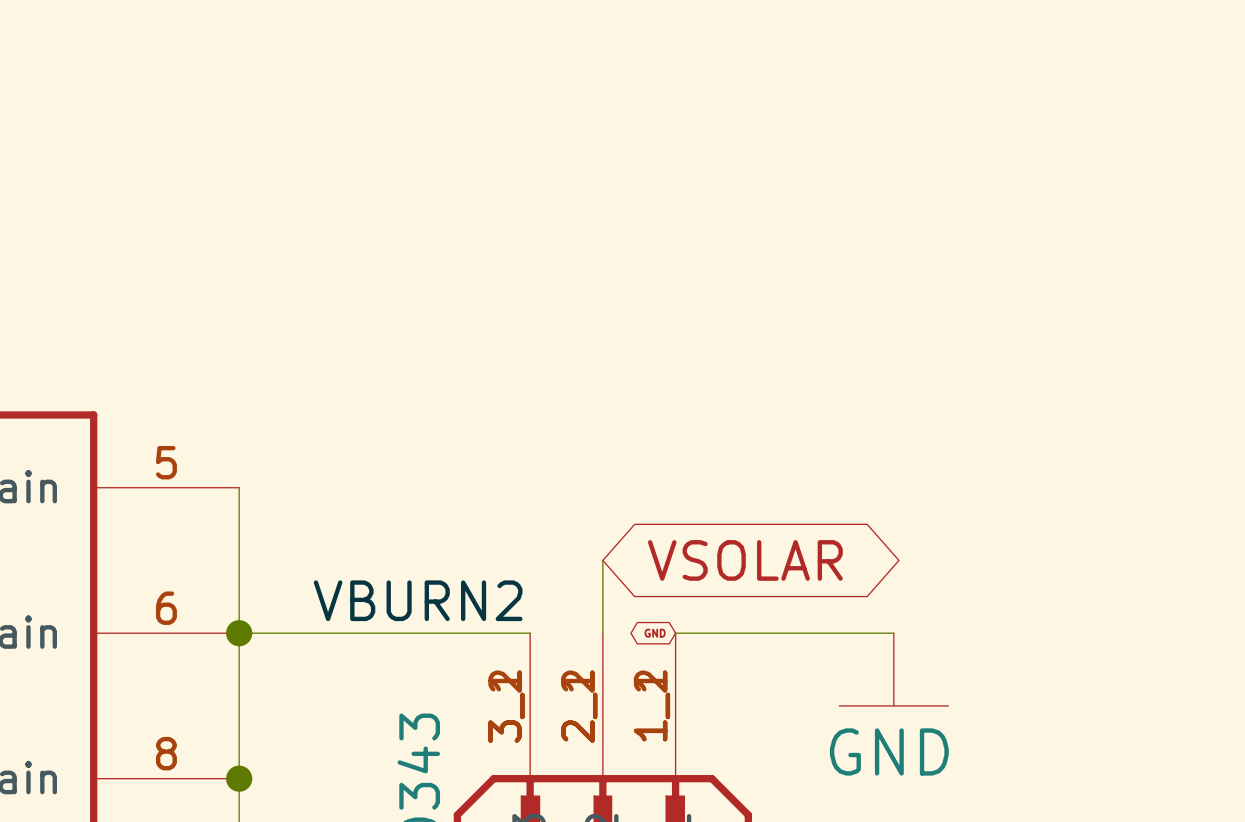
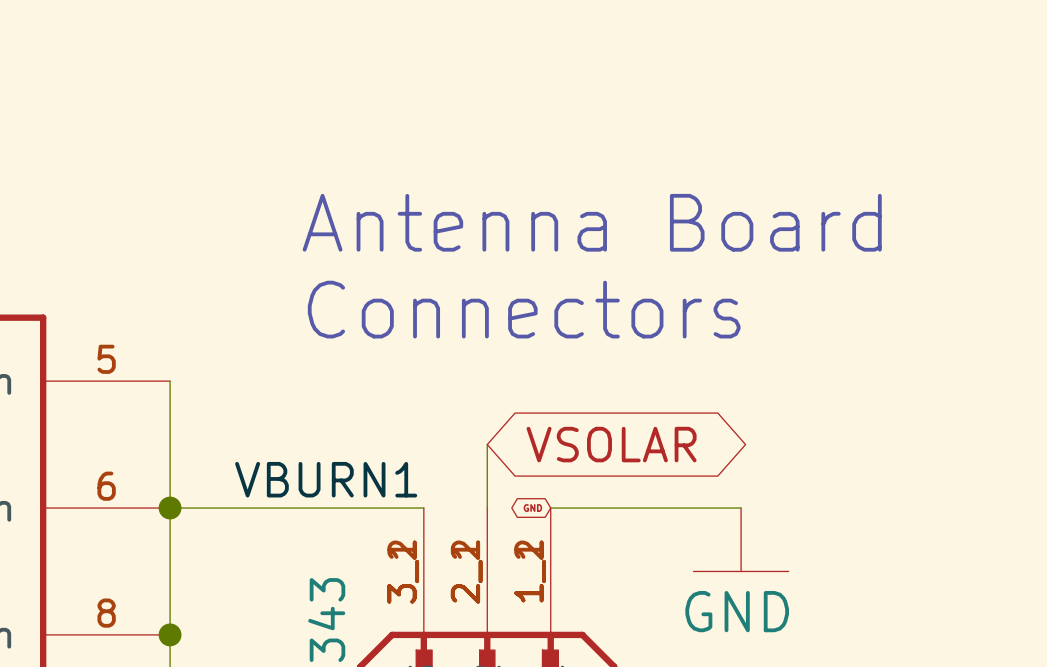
text: none -> Antenna Board (592, 222)
text: none -> Connectors (524, 309)
label: VBURN2 (418, 600) -> VBURN1 (326, 479)

